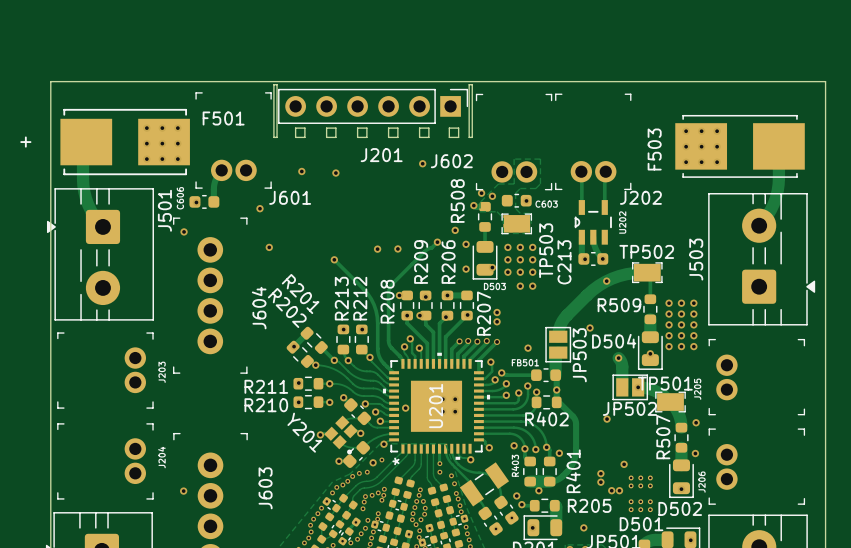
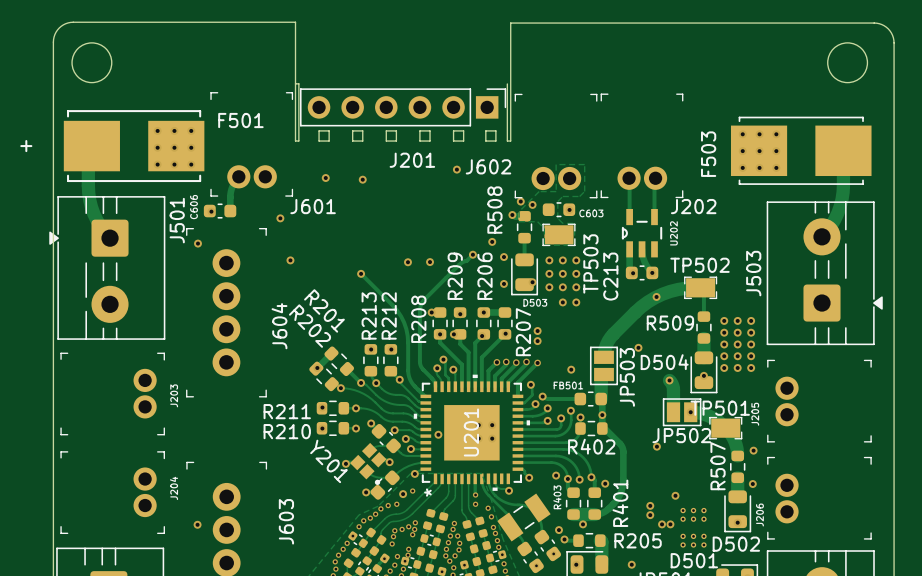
round board edge: none -> [71, 42, 113, 83]
round board edge: none -> [827, 42, 868, 83]
board edge: (50, 81) (825, 81) -> (53, 80) (54, 36) (59, 28) (68, 22) (295, 22) (295, 83)
board edge: (469, 84) (472, 84) -> (894, 80) (893, 37) (888, 28) (876, 23) (510, 23) (510, 83)

